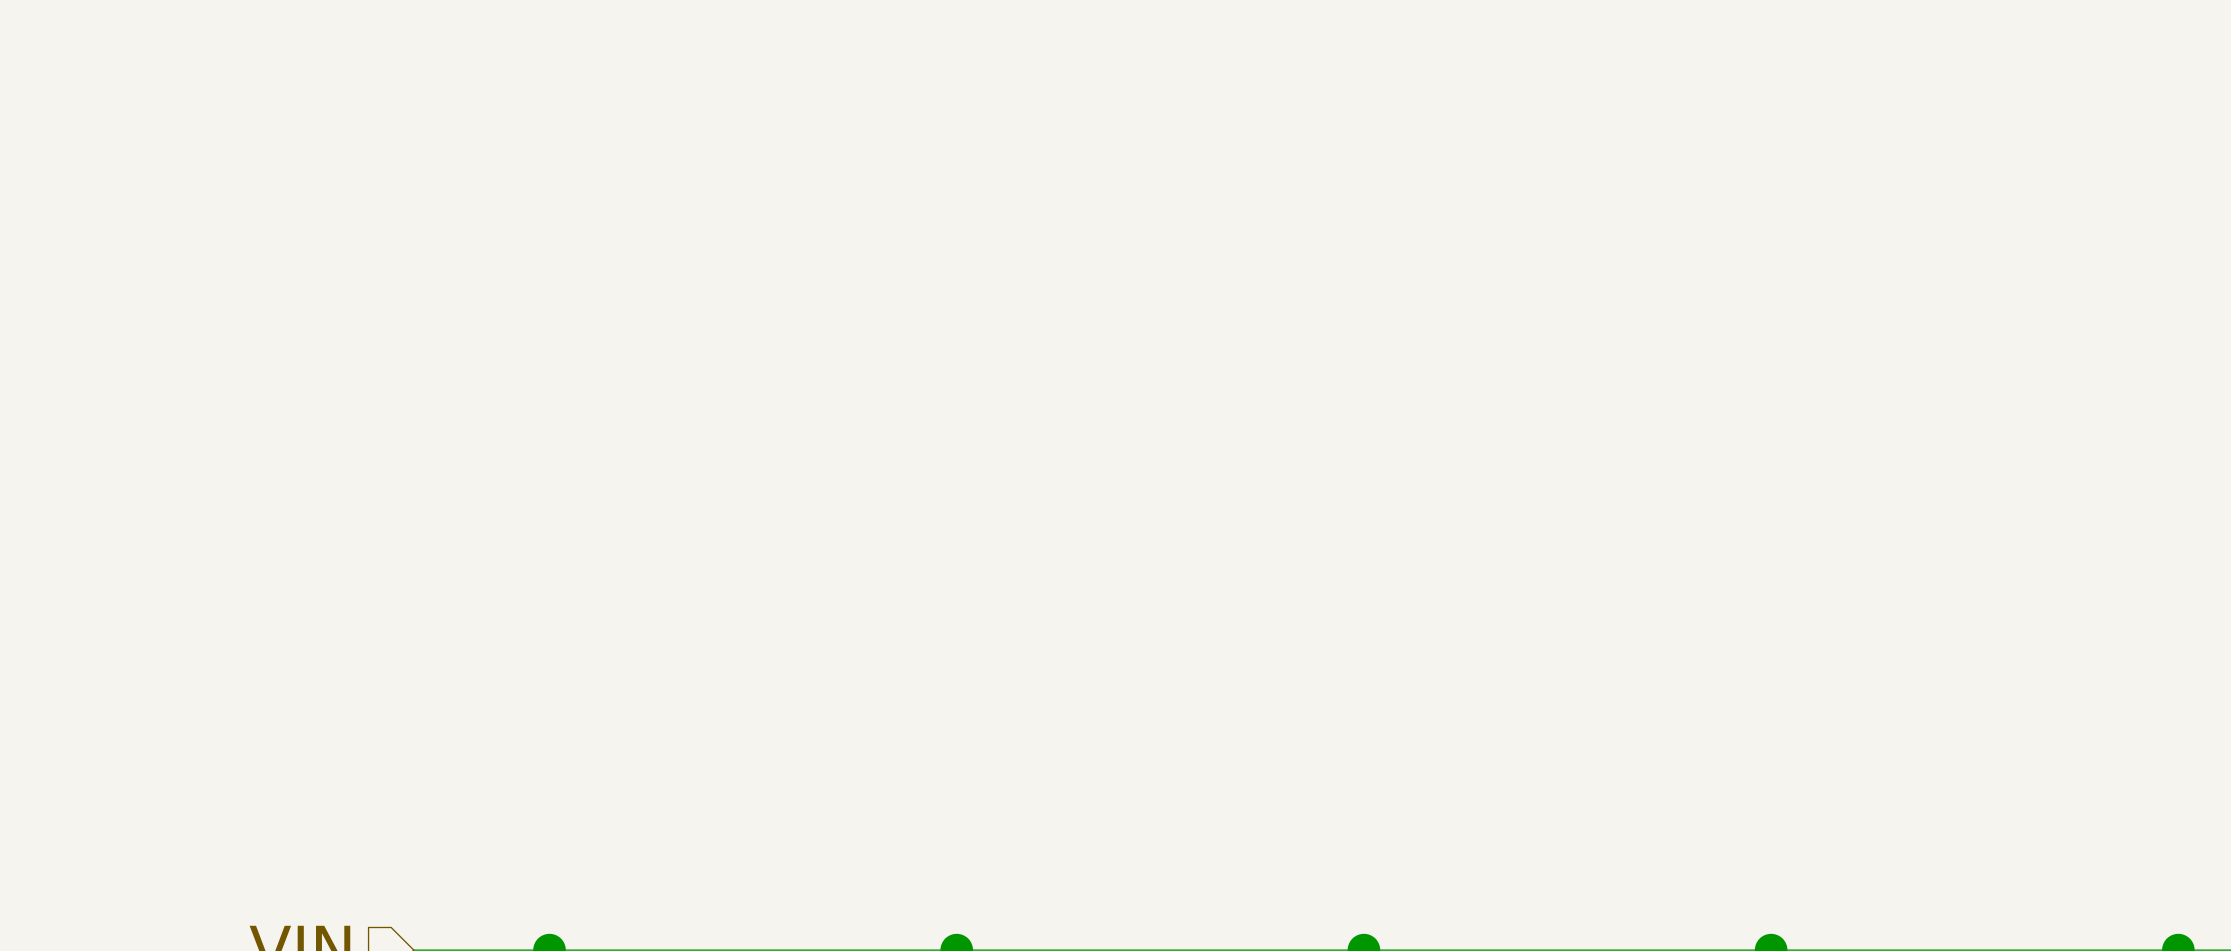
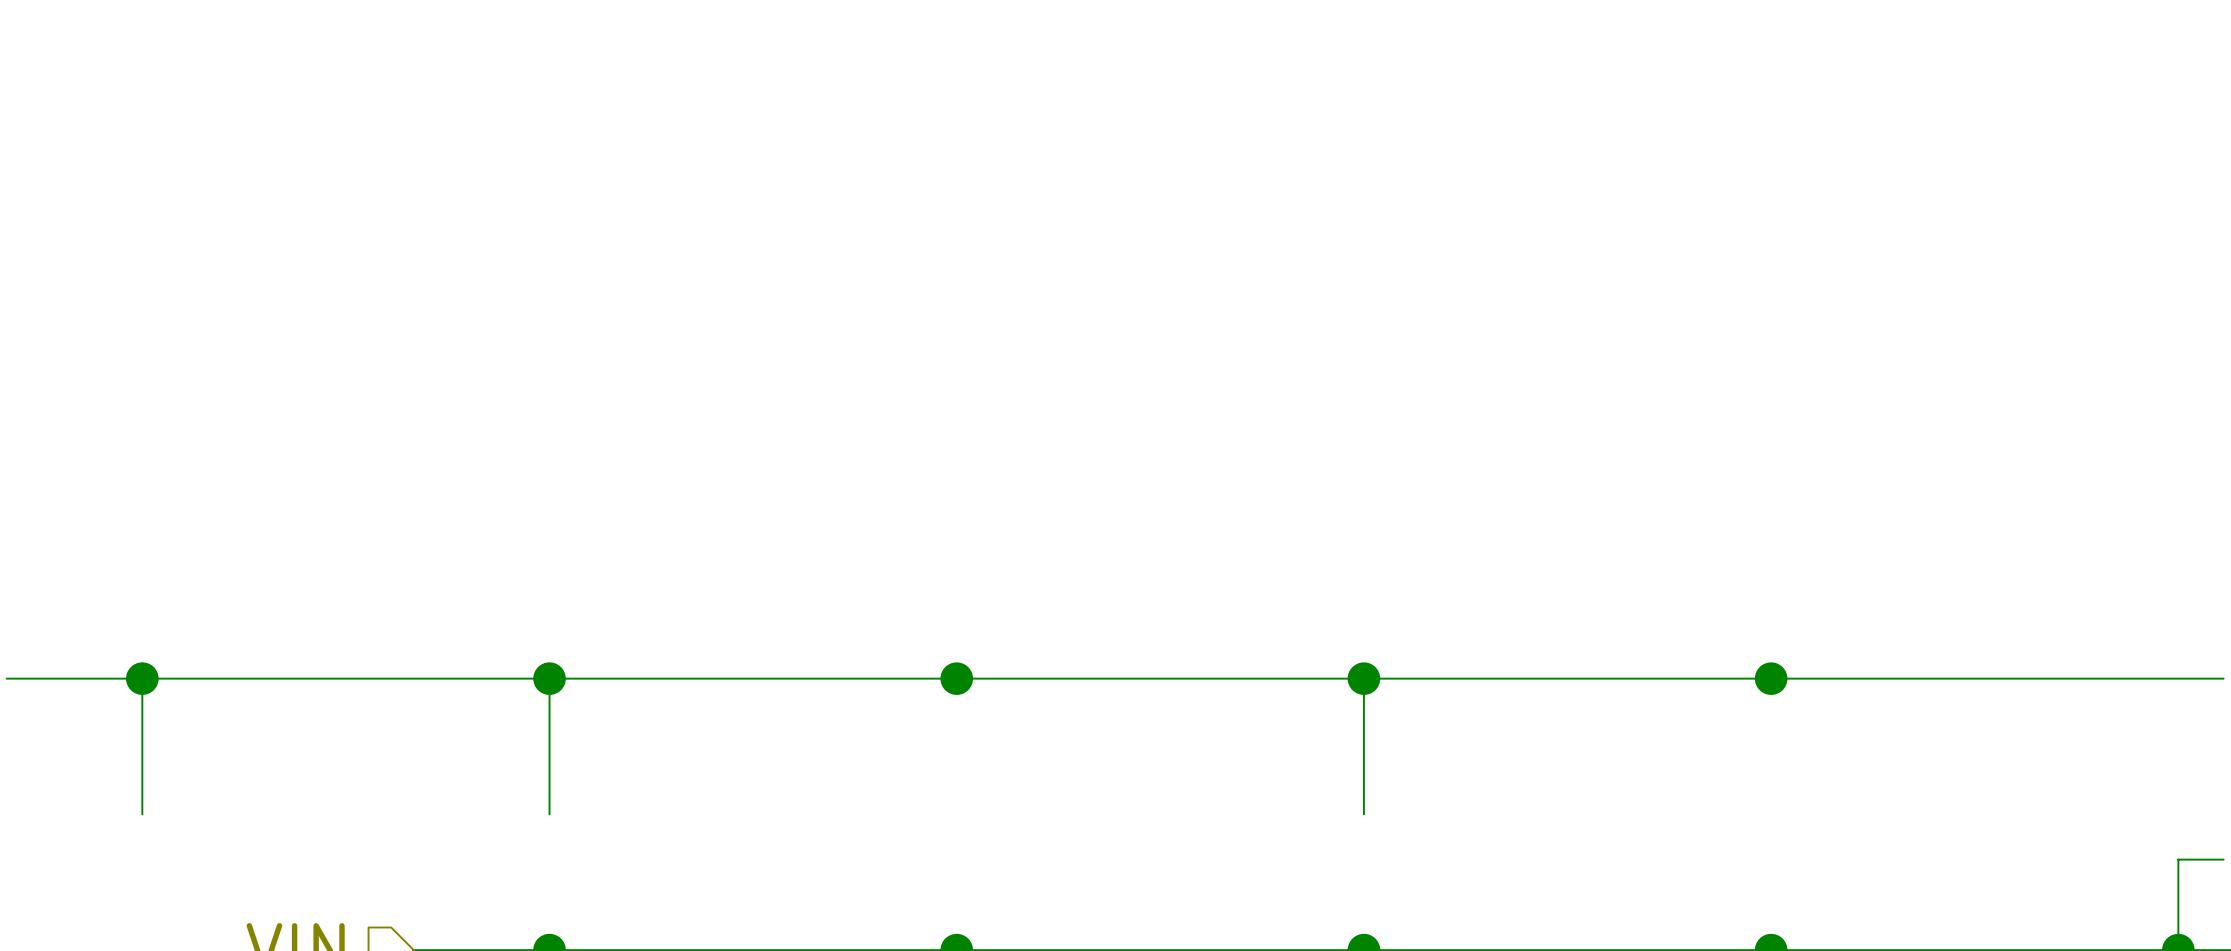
wire: none -> (6, 678) (2223, 678)
wire: none -> (142, 678) (142, 814)
junction: none -> (142, 678)
wire: none -> (549, 678) (549, 814)
junction: none -> (549, 678)
junction: none -> (956, 678)
wire: none -> (1363, 678) (1363, 814)
junction: none -> (1363, 678)
junction: none -> (1771, 678)
wire: none -> (2223, 859) (2178, 859) (2178, 950)

